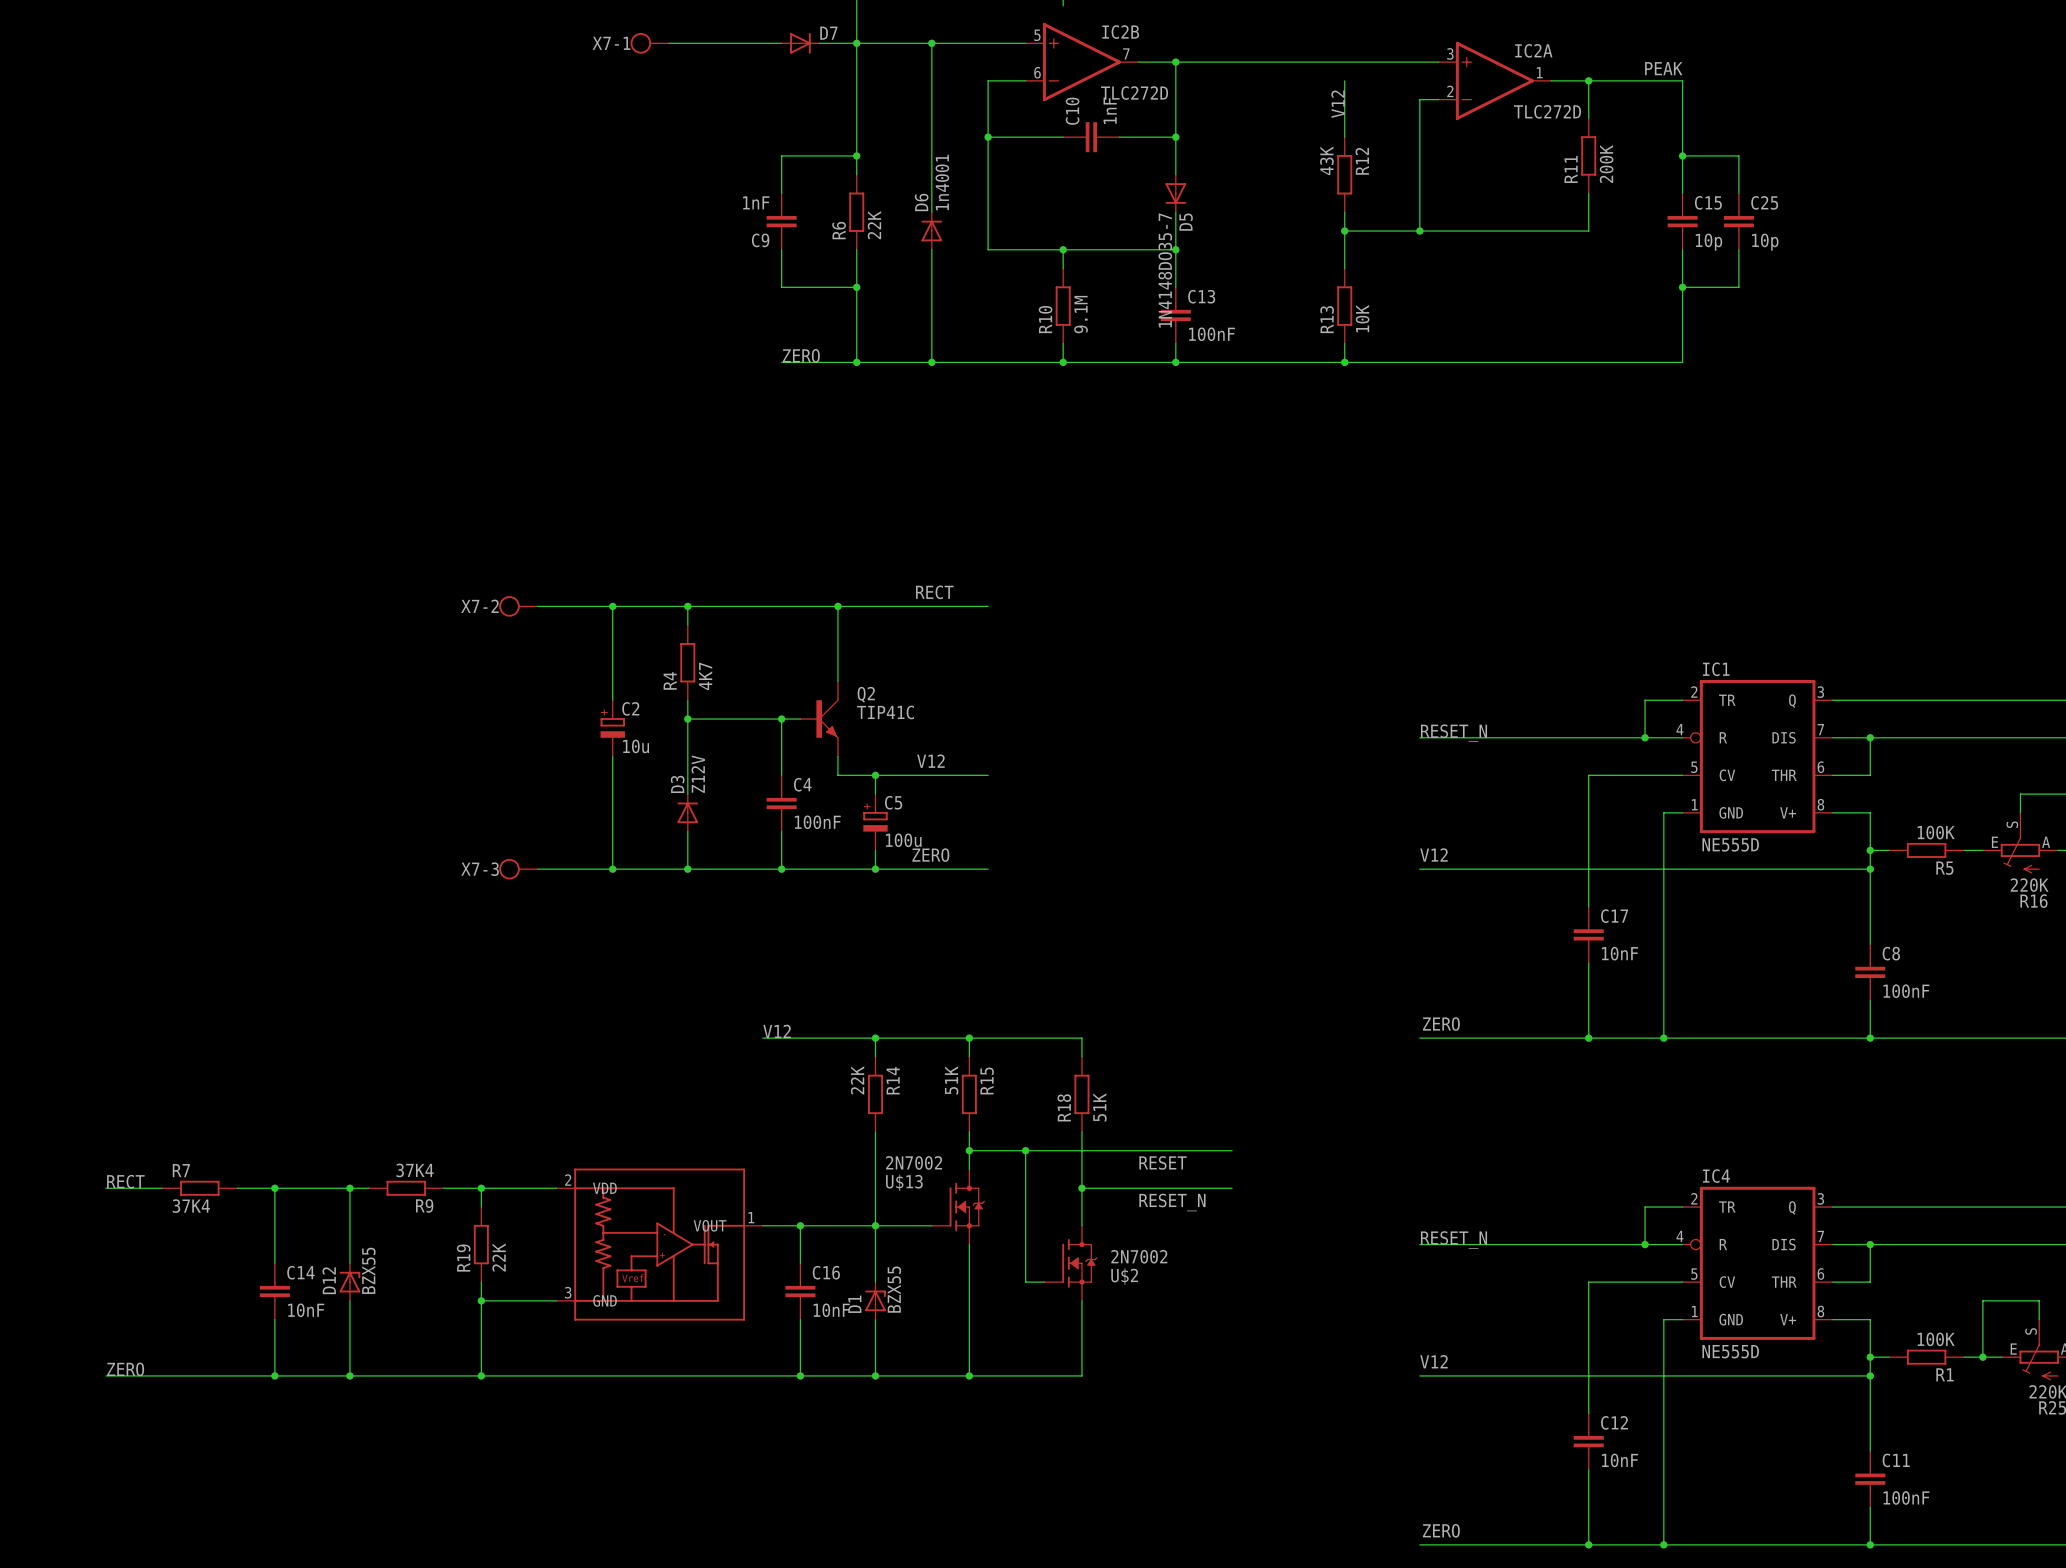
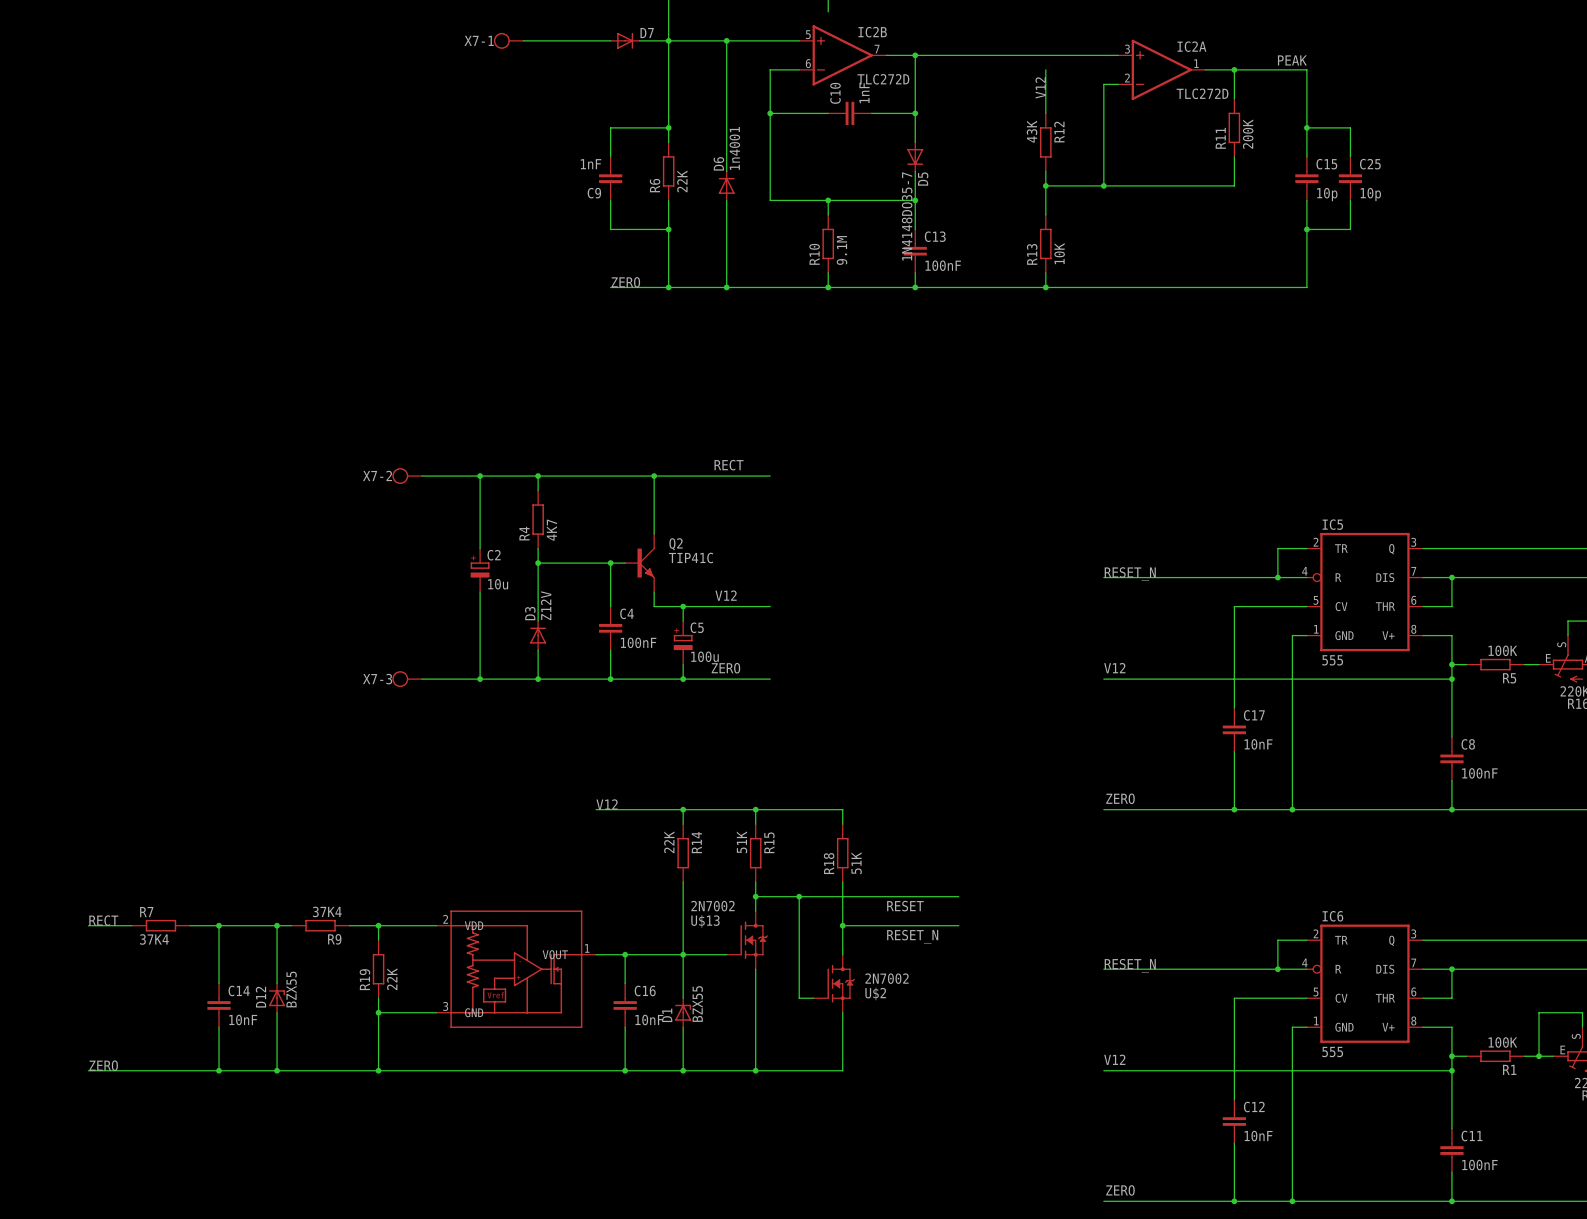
IC1 name: IC1 (1716, 669) -> IC5 (1332, 524)
IC1 value: NE555D (1730, 844) -> 555 (1332, 660)
IC4 name: IC4 (1716, 1176) -> IC6 (1332, 916)
IC4 value: NE555D (1730, 1351) -> 555 (1332, 1052)

